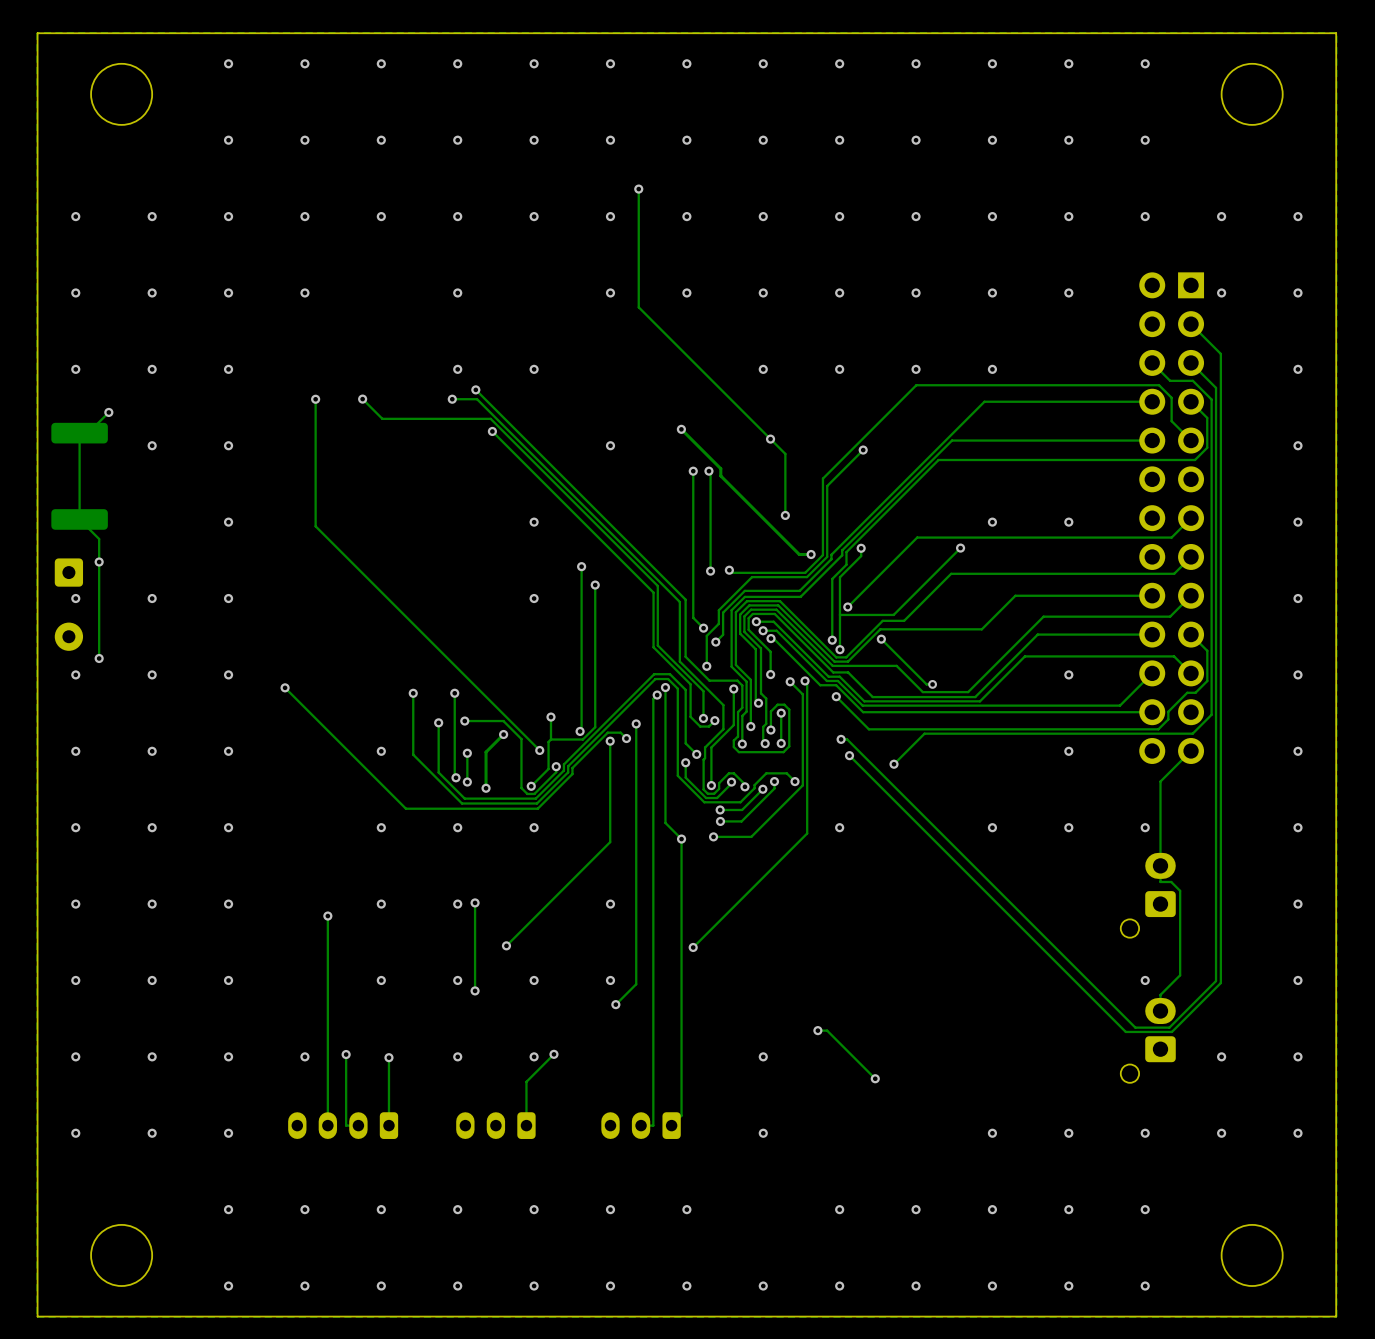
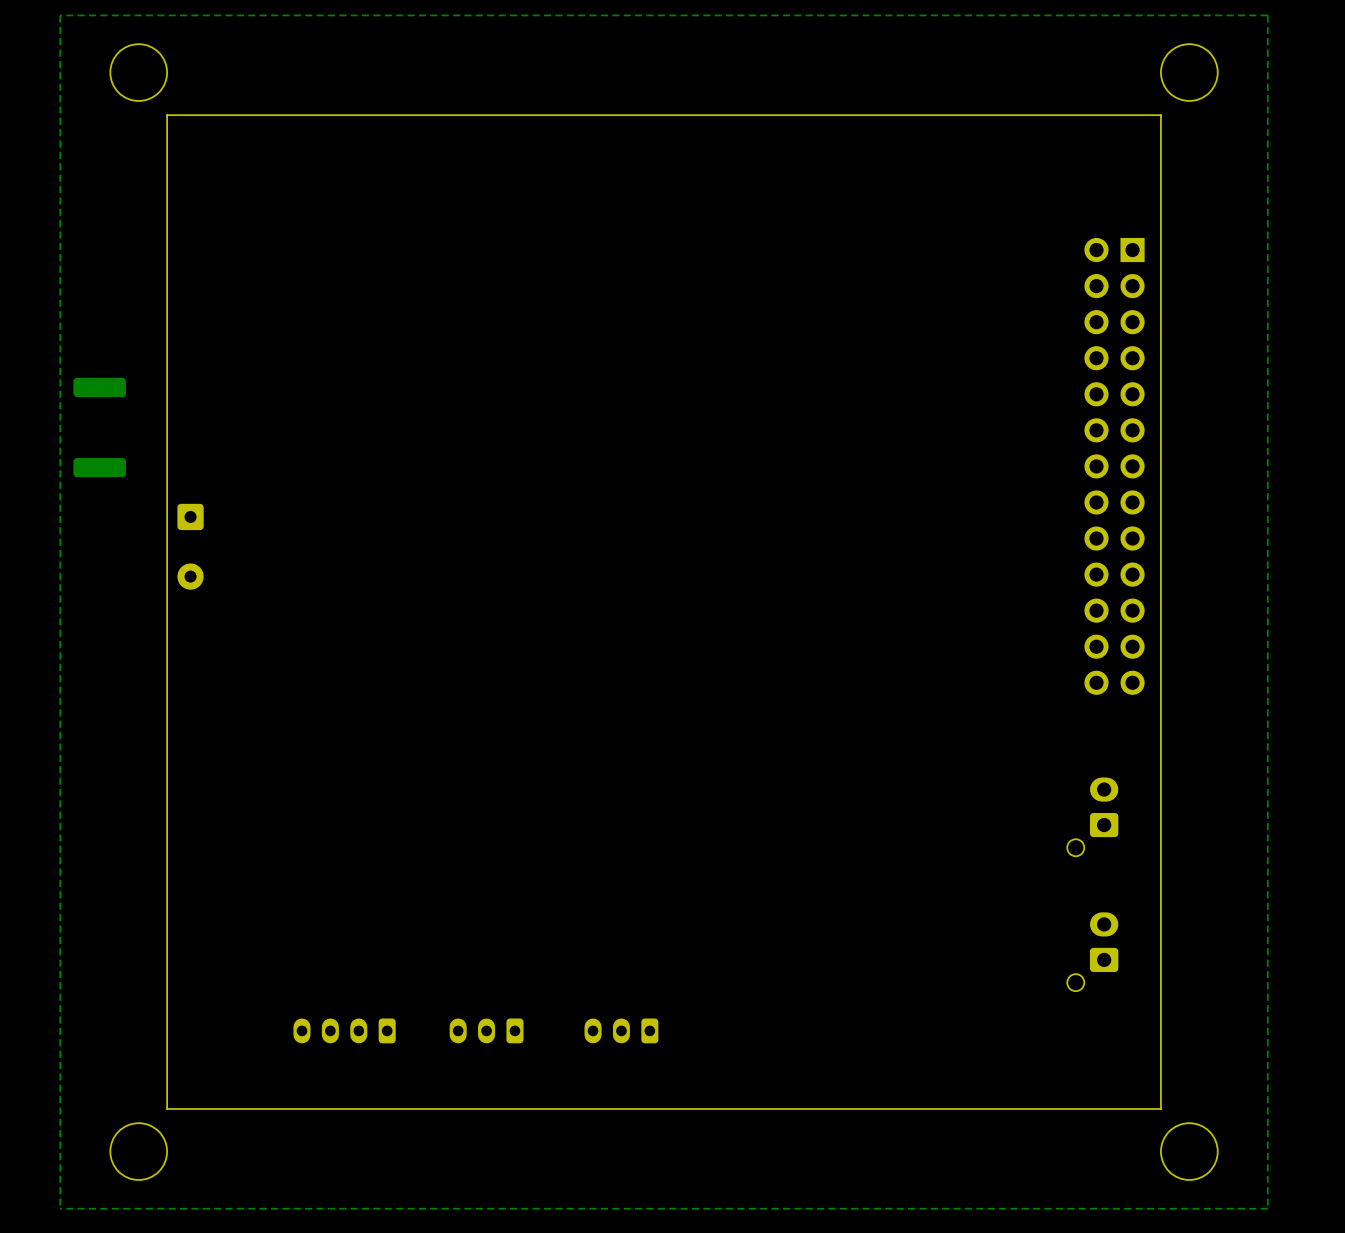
board edge: (1336, 33) (37, 33) (37, 1316) (1336, 1316) (1336, 33) -> (1160, 115) (1160, 1108) (167, 1108) (167, 115) (1160, 115)
via: (228, 63) -> none
via: (304, 63) -> none
via: (381, 63) -> none
via: (457, 63) -> none
via: (534, 63) -> none
via: (610, 63) -> none
via: (686, 63) -> none
via: (763, 63) -> none
via: (839, 63) -> none
via: (916, 63) -> none
via: (992, 63) -> none
via: (1068, 63) -> none
via: (1145, 63) -> none
via: (228, 140) -> none
via: (304, 140) -> none
via: (381, 140) -> none
via: (457, 140) -> none
via: (534, 140) -> none
via: (610, 140) -> none
via: (686, 140) -> none
via: (763, 140) -> none
via: (839, 140) -> none
via: (916, 140) -> none
via: (992, 140) -> none
via: (1068, 140) -> none
via: (1145, 140) -> none
track: (638, 189) (638, 307) (785, 453) (785, 515) -> none
via: (638, 189) -> none
via: (75, 216) -> none
via: (152, 216) -> none
via: (228, 216) -> none
via: (304, 216) -> none
via: (381, 216) -> none
via: (457, 216) -> none
via: (534, 216) -> none
via: (610, 216) -> none
via: (686, 216) -> none
via: (763, 216) -> none
via: (839, 216) -> none
via: (916, 216) -> none
via: (992, 216) -> none
via: (1068, 216) -> none
via: (1145, 216) -> none
via: (1221, 216) -> none
via: (1297, 216) -> none
via: (75, 292) -> none
via: (152, 292) -> none
via: (228, 292) -> none
via: (304, 292) -> none
via: (457, 292) -> none
via: (610, 292) -> none
via: (686, 292) -> none
via: (763, 292) -> none
via: (839, 292) -> none
via: (916, 292) -> none
via: (992, 292) -> none
via: (1068, 292) -> none
via: (1221, 292) -> none
via: (1297, 292) -> none
track: (1191, 324) (1220, 353) (1220, 983) (1171, 1031) (1125, 1031) (849, 755) -> none
track: (1152, 362) (1170, 380) (1192, 380) (1211, 399) (1211, 714) (1192, 733) (924, 733) (894, 764) -> none
track: (1191, 362) (1216, 387) (1216, 981) (1169, 1027) (1135, 1027) (847, 739) (841, 739) -> none
via: (75, 369) -> none
via: (152, 369) -> none
via: (228, 369) -> none
via: (457, 369) -> none
via: (534, 369) -> none
via: (763, 369) -> none
via: (839, 369) -> none
via: (916, 369) -> none
via: (992, 369) -> none
via: (1297, 369) -> none
track: (475, 389) (685, 599) (685, 656) (709, 680) (737, 680) (742, 685) (742, 707) (738, 712) (738, 736) (733, 740) (733, 747) (738, 752) (783, 752) (789, 746) (789, 709) (784, 704) (777, 704) (770, 711) (770, 730) -> none
via: (475, 389) -> none
track: (315, 399) (315, 526) (539, 750) -> none
via: (315, 399) -> none
track: (362, 399) (382, 418) (490, 418) (657, 585) (657, 645) (703, 691) (703, 718) -> none
via: (362, 399) -> none
track: (452, 399) (477, 399) (679, 601) (679, 661) (723, 705) (723, 729) (705, 747) (703, 789) (707, 793) (714, 793) (719, 788) (719, 783) (728, 773) (733, 773) (744, 784) (744, 786) -> none
via: (452, 399) -> none
track: (1152, 401) (984, 401) (831, 554) (831, 559) (799, 590) (744, 590) (723, 612) (723, 634) (715, 642) -> none
track: (1191, 401) (1207, 417) (1207, 447) (1195, 460) (938, 460) (846, 552) (846, 564) (832, 578) (832, 640) -> none
track: (108, 412) (88, 433) (79, 433) (79, 519) (99, 539) (99, 658) -> none
via: (108, 412) -> none
track: (681, 429) (720, 468) (720, 475) (799, 554) (811, 554) -> none
via: (681, 429) -> none
track: (492, 431) (653, 592) (653, 647) (690, 684) (690, 716) (700, 726) (708, 726) (714, 720) -> none
via: (492, 431) -> none
via: (770, 439) -> none
track: (1152, 440) (952, 440) (842, 550) (842, 555) (800, 596) (744, 596) (731, 610) (731, 666) (746, 681) (746, 711) (742, 715) (742, 744) -> none
track: (1191, 440) (1171, 421) (1171, 397) (1159, 385) (916, 385) (822, 478) (822, 555) (805, 572) (732, 572) (729, 570) -> none
via: (152, 445) -> none
via: (228, 445) -> none
via: (610, 445) -> none
via: (1297, 445) -> none
track: (863, 450) (827, 486) (827, 556) (806, 577) (752, 577) (718, 610) (718, 623) (706, 635) (706, 666) -> none
via: (863, 450) -> none
track: (693, 471) (693, 617) (703, 628) -> none
via: (693, 471) -> none
track: (708, 471) (710, 472) (710, 571) -> none
via: (708, 471) -> none
via: (785, 515) -> none
track: (1191, 518) (1171, 537) (917, 537) (847, 607) -> none
via: (228, 522) -> none
via: (534, 522) -> none
via: (992, 522) -> none
via: (1068, 522) -> none
via: (1297, 522) -> none
track: (861, 548) (861, 556) (839, 577) (839, 649) -> none
via: (861, 548) -> none
track: (960, 548) (893, 614) (839, 614) -> none
via: (960, 548) -> none
via: (811, 554) -> none
track: (1191, 556) (1174, 573) (951, 573) (904, 620) (882, 620) (846, 657) (836, 657) (780, 601) (747, 601) (735, 612) (735, 664) (750, 679) (750, 726) -> none
via: (99, 562) -> none
track: (581, 566) (580, 731) -> none
via: (581, 566) -> none
via: (729, 570) -> none
via: (710, 571) -> none
track: (595, 585) (595, 727) (582, 739) (550, 739) -> none
via: (595, 585) -> none
track: (1152, 595) (1015, 595) (981, 629) (880, 629) (848, 661) (834, 661) (778, 605) (749, 605) (740, 614) (740, 633) (755, 649) (755, 700) (758, 703) -> none
track: (1191, 595) (1170, 616) (1043, 616) (968, 692) (922, 692) (896, 665) (832, 665) (776, 609) (751, 609) (744, 616) (744, 631) (760, 648) (760, 693) (766, 698) (766, 723) (763, 726) (763, 741) (765, 743) -> none
via: (75, 598) -> none
via: (152, 598) -> none
via: (228, 598) -> none
via: (534, 598) -> none
via: (1297, 598) -> none
part position: (68, 604) -> (190, 546)
via: (847, 607) -> none
track: (756, 621) (773, 621) (828, 676) (839, 676) (864, 701) (980, 701) (1024, 656) (1174, 656) (1191, 673) -> none
via: (756, 621) -> none
via: (703, 628) -> none
track: (763, 630) (776, 630) (826, 680) (837, 680) (862, 705) (1120, 705) (1152, 673) -> none
via: (763, 630) -> none
track: (1152, 634) (1037, 634) (975, 697) (872, 697) (848, 672) (833, 672) (774, 613) (752, 613) (748, 618) (748, 629) (770, 651) (770, 674) -> none
track: (1191, 634) (1207, 650) (1207, 681) (1195, 692) (1187, 692) (1168, 711) (1168, 719) (1158, 729) (868, 729) (836, 696) -> none
track: (771, 638) (773, 638) (820, 685) (836, 685) (863, 712) (1152, 712) -> none
via: (771, 638) -> none
track: (881, 639) (926, 684) (932, 684) -> none
via: (881, 639) -> none
via: (832, 640) -> none
via: (715, 642) -> none
via: (839, 649) -> none
via: (99, 658) -> none
via: (706, 666) -> none
via: (75, 674) -> none
via: (152, 674) -> none
via: (228, 674) -> none
via: (770, 674) -> none
via: (1068, 674) -> none
via: (1297, 674) -> none
track: (805, 680) (807, 683) (807, 833) (693, 947) -> none
via: (805, 680) -> none
track: (790, 681) (802, 694) (802, 785) (751, 836) (713, 836) -> none
via: (790, 681) -> none
via: (932, 684) -> none
track: (285, 687) (405, 808) (537, 808) (572, 774) (572, 768) (607, 732) (620, 732) (626, 738) -> none
via: (285, 687) -> none
track: (665, 687) (665, 822) (681, 839) (681, 1115) (671, 1125) -> none
via: (665, 687) -> none
track: (733, 688) (733, 725) (711, 747) (711, 785) -> none
via: (733, 688) -> none
track: (413, 693) (413, 754) (462, 803) (536, 803) (568, 772) (568, 766) (655, 679) (668, 679) (677, 688) (677, 775) (704, 802) (740, 802) (766, 773) (786, 773) (795, 781) -> none
via: (413, 693) -> none
track: (454, 693) (456, 777) -> none
via: (454, 693) -> none
track: (657, 695) (653, 698) (653, 1125) (641, 1125) -> none
via: (657, 695) -> none
via: (836, 696) -> none
via: (758, 703) -> none
track: (781, 713) (781, 743) -> none
via: (781, 713) -> none
track: (550, 717) (550, 739) -> none
via: (550, 717) -> none
via: (703, 718) -> none
via: (714, 720) -> none
track: (464, 721) (503, 721) (521, 739) (521, 788) (527, 793) (534, 793) (556, 772) (556, 766) -> none
via: (464, 721) -> none
track: (438, 722) (438, 772) (464, 798) (535, 798) (563, 770) (563, 764) (654, 674) (669, 674) (685, 689) (685, 743) (696, 754) -> none
via: (438, 722) -> none
track: (636, 723) (636, 984) (615, 1004) -> none
via: (636, 723) -> none
via: (750, 726) -> none
via: (770, 730) -> none
via: (580, 731) -> none
track: (503, 734) (486, 752) (486, 788) -> none
via: (503, 734) -> none
via: (626, 738) -> none
track: (550, 739) (548, 741) (548, 768) (531, 786) -> none
via: (841, 739) -> none
track: (610, 741) (610, 842) (506, 945) -> none
via: (610, 741) -> none
via: (765, 743) -> none
via: (781, 743) -> none
via: (742, 744) -> none
via: (539, 750) -> none
track: (1191, 750) (1160, 781) (1160, 881) (1171, 881) (1180, 890) (1180, 975) (1160, 994) (1160, 1011) -> none
via: (75, 751) -> none
via: (152, 751) -> none
via: (228, 751) -> none
via: (381, 751) -> none
via: (1068, 751) -> none
via: (1297, 751) -> none
track: (467, 753) (467, 782) -> none
via: (467, 753) -> none
via: (696, 754) -> none
via: (849, 755) -> none
track: (685, 762) (685, 777) (706, 798) (717, 798) (731, 782) -> none
via: (685, 762) -> none
via: (894, 764) -> none
via: (556, 766) -> none
via: (456, 777) -> none
track: (774, 781) (774, 788) (741, 821) (720, 821) -> none
via: (774, 781) -> none
via: (795, 781) -> none
via: (467, 782) -> none
via: (731, 782) -> none
via: (711, 785) -> none
via: (531, 786) -> none
via: (744, 786) -> none
via: (486, 788) -> none
track: (762, 789) (742, 809) (720, 809) -> none
via: (762, 789) -> none
via: (720, 809) -> none
via: (720, 821) -> none
via: (75, 827) -> none
via: (152, 827) -> none
via: (228, 827) -> none
via: (381, 827) -> none
via: (457, 827) -> none
via: (534, 827) -> none
via: (839, 827) -> none
via: (992, 827) -> none
via: (1068, 827) -> none
via: (1145, 827) -> none
via: (1297, 827) -> none
via: (713, 836) -> none
via: (681, 839) -> none
track: (475, 902) (475, 990) -> none
via: (475, 902) -> none
via: (75, 904) -> none
via: (152, 904) -> none
via: (228, 904) -> none
via: (381, 904) -> none
via: (457, 904) -> none
via: (610, 904) -> none
via: (1297, 904) -> none
track: (327, 916) (327, 1125) -> none
via: (327, 916) -> none
via: (506, 945) -> none
via: (693, 947) -> none
via: (75, 980) -> none
via: (152, 980) -> none
via: (228, 980) -> none
via: (381, 980) -> none
via: (457, 980) -> none
via: (534, 980) -> none
via: (610, 980) -> none
via: (1145, 980) -> none
via: (1297, 980) -> none
via: (475, 990) -> none
via: (615, 1004) -> none
track: (817, 1030) (827, 1030) (875, 1078) -> none
via: (817, 1030) -> none
track: (346, 1054) (346, 1125) (358, 1125) -> none
via: (346, 1054) -> none
track: (553, 1054) (526, 1081) (526, 1125) -> none
via: (553, 1054) -> none
via: (75, 1056) -> none
via: (152, 1056) -> none
via: (228, 1056) -> none
via: (304, 1056) -> none
via: (457, 1056) -> none
via: (534, 1056) -> none
via: (763, 1056) -> none
via: (1221, 1056) -> none
via: (1297, 1056) -> none
track: (388, 1057) (388, 1125) -> none
via: (388, 1057) -> none
via: (875, 1078) -> none
via: (75, 1133) -> none
via: (152, 1133) -> none
via: (228, 1133) -> none
via: (763, 1133) -> none
via: (992, 1133) -> none
via: (1068, 1133) -> none
via: (1145, 1133) -> none
via: (1221, 1133) -> none
via: (1297, 1133) -> none
via: (228, 1209) -> none
via: (304, 1209) -> none
via: (381, 1209) -> none
via: (457, 1209) -> none
via: (534, 1209) -> none
via: (610, 1209) -> none
via: (686, 1209) -> none
via: (839, 1209) -> none
via: (916, 1209) -> none
via: (992, 1209) -> none
via: (1068, 1209) -> none
via: (1145, 1209) -> none
via: (228, 1286) -> none
via: (304, 1286) -> none
via: (381, 1286) -> none
via: (457, 1286) -> none
via: (534, 1286) -> none
via: (610, 1286) -> none
via: (686, 1286) -> none
via: (763, 1286) -> none
via: (839, 1286) -> none
via: (916, 1286) -> none
via: (992, 1286) -> none
via: (1068, 1286) -> none
via: (1145, 1286) -> none

